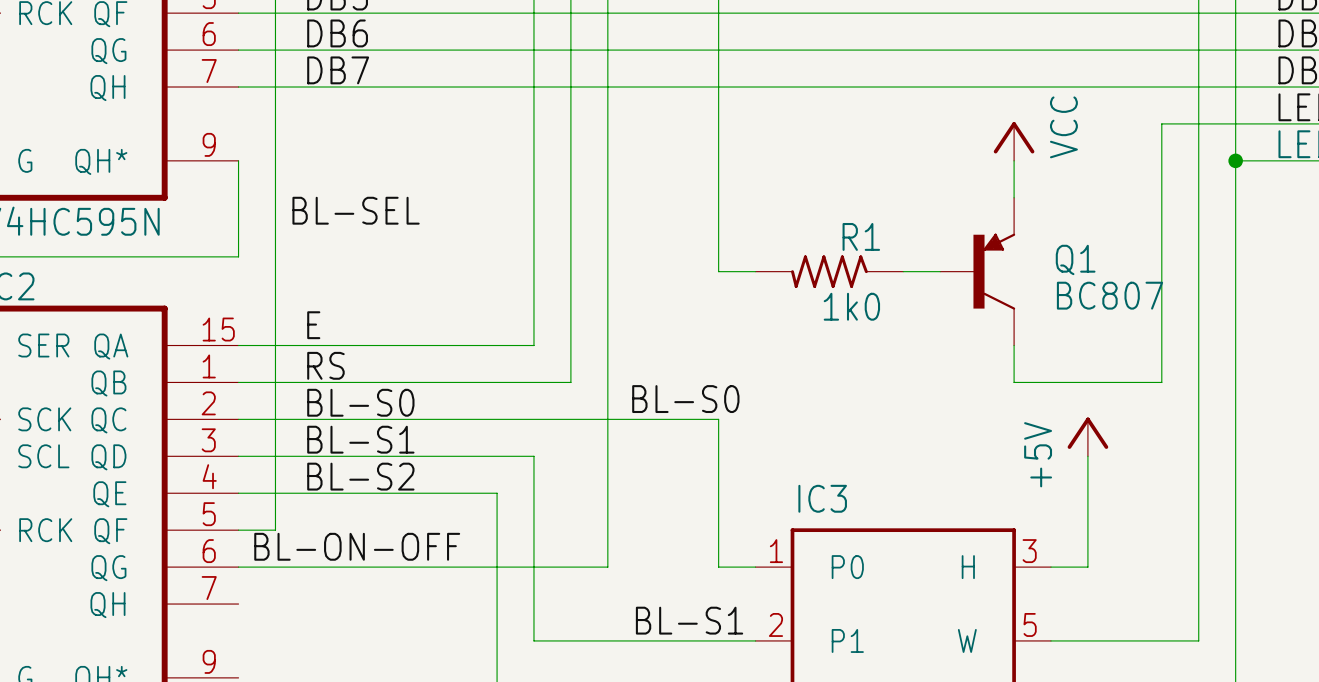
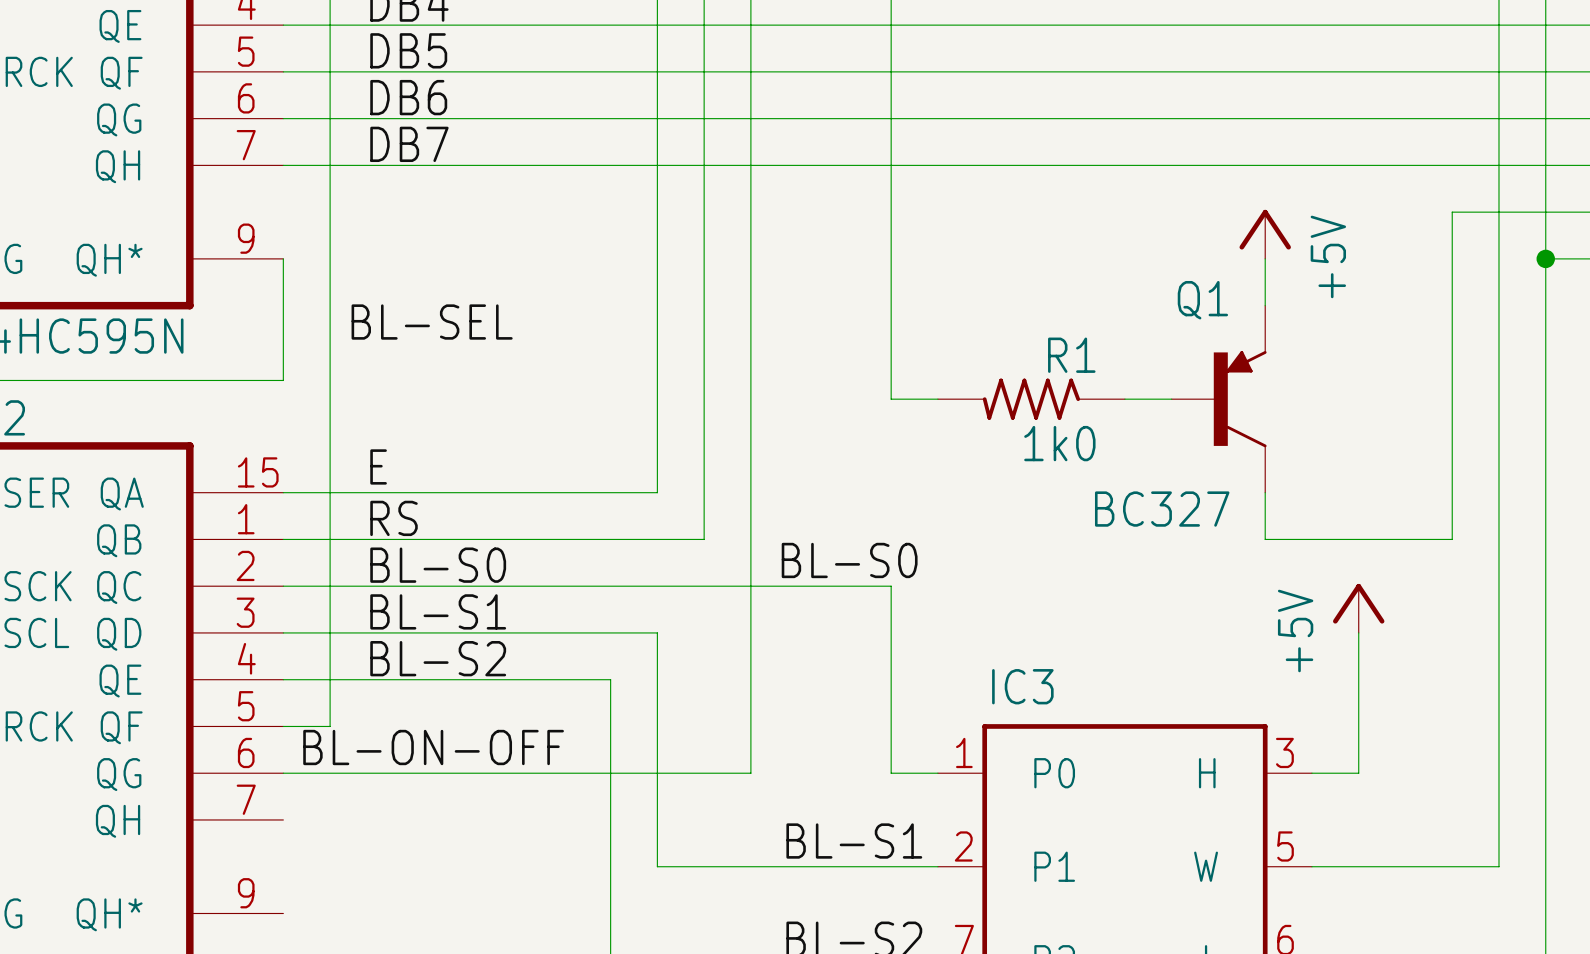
power symbol: VCC (1014, 141) -> +5V (1265, 234)
Q1 name position: Q1 (1075, 259) -> Q1 (1202, 300)
Q1 value: BC807 (1109, 295) -> BC327 (1162, 509)

